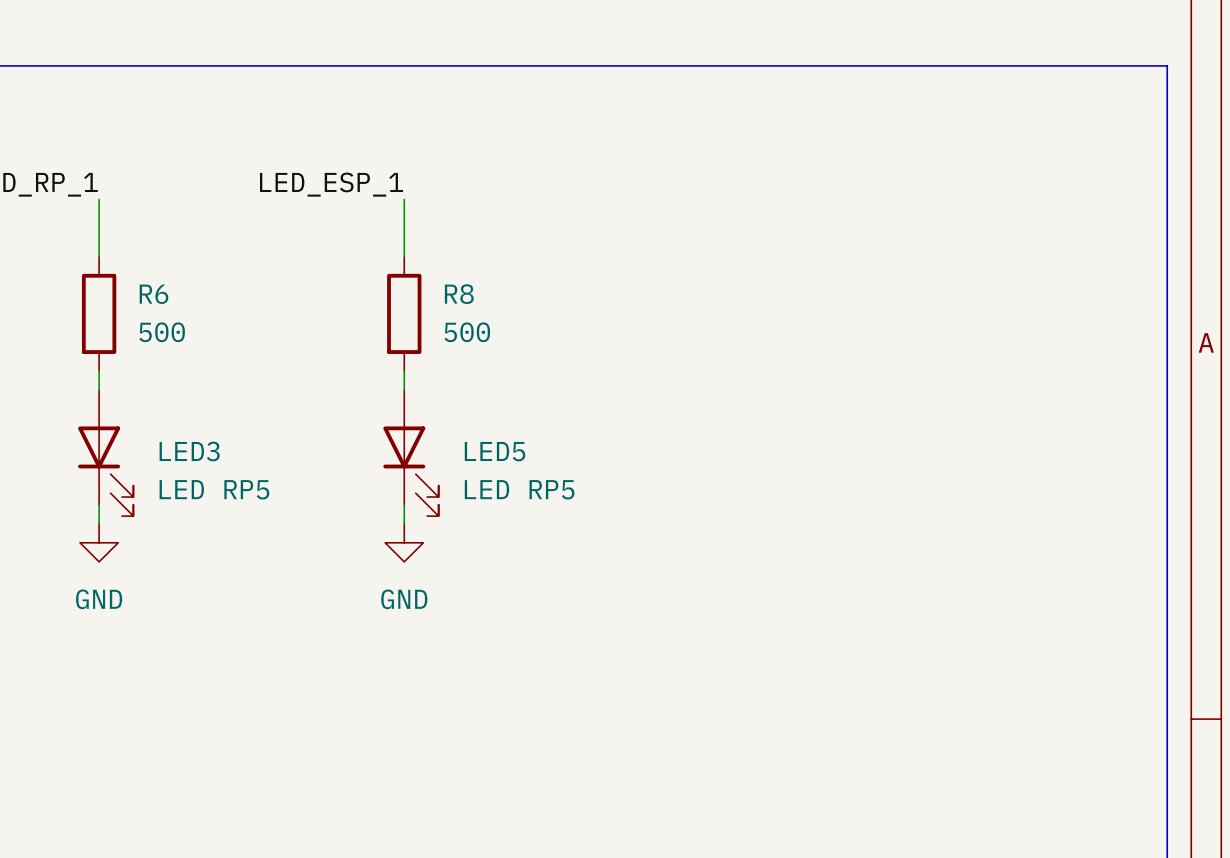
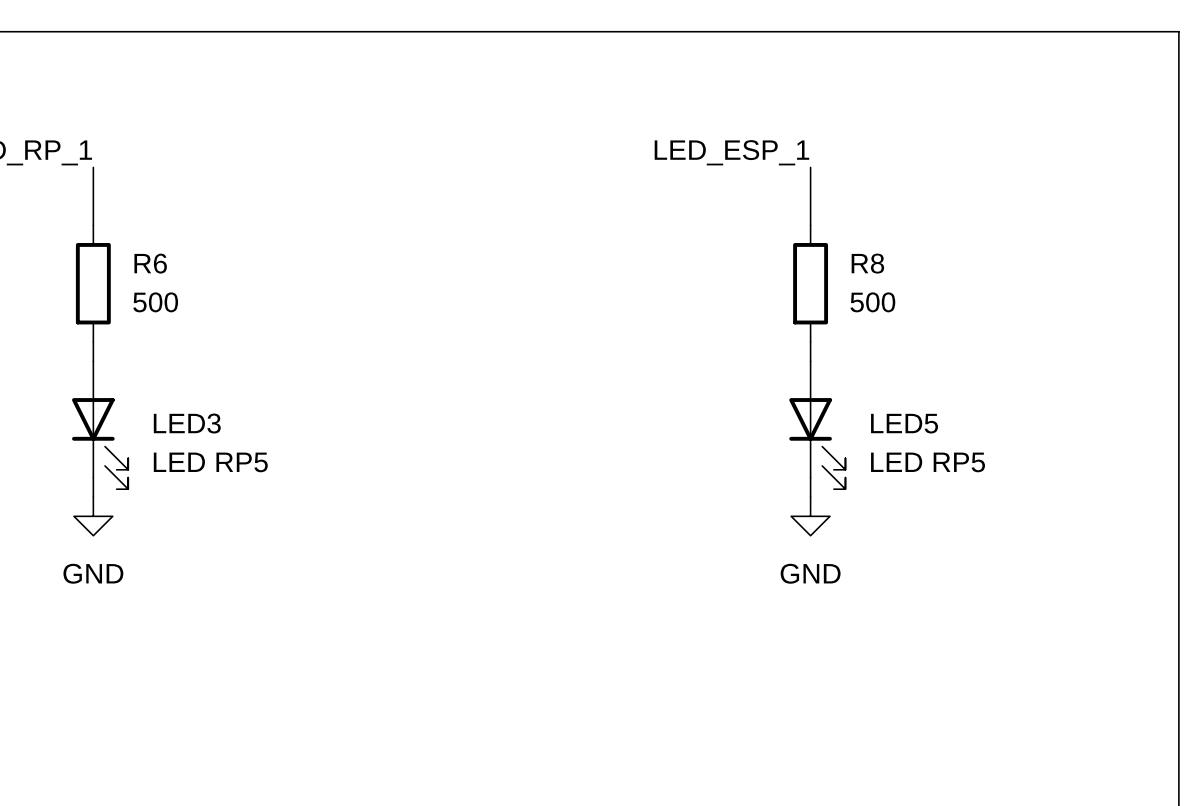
label: LED_ESP_1 (331, 184) -> none
label: none -> LED_ESP_1 (731, 152)
wire: (404, 199) (404, 256) -> none
wire: none -> (810, 167) (810, 225)
R8 position: (404, 313) -> (810, 283)
wire: (404, 371) (404, 390) -> none
wire: none -> (810, 341) (810, 361)
LED5 position: (410, 453) -> (817, 425)
wire: (404, 504) (404, 523) -> none
wire: none -> (810, 477) (810, 496)
power symbol: GND (404, 542) -> none
power symbol: none -> GND (810, 516)

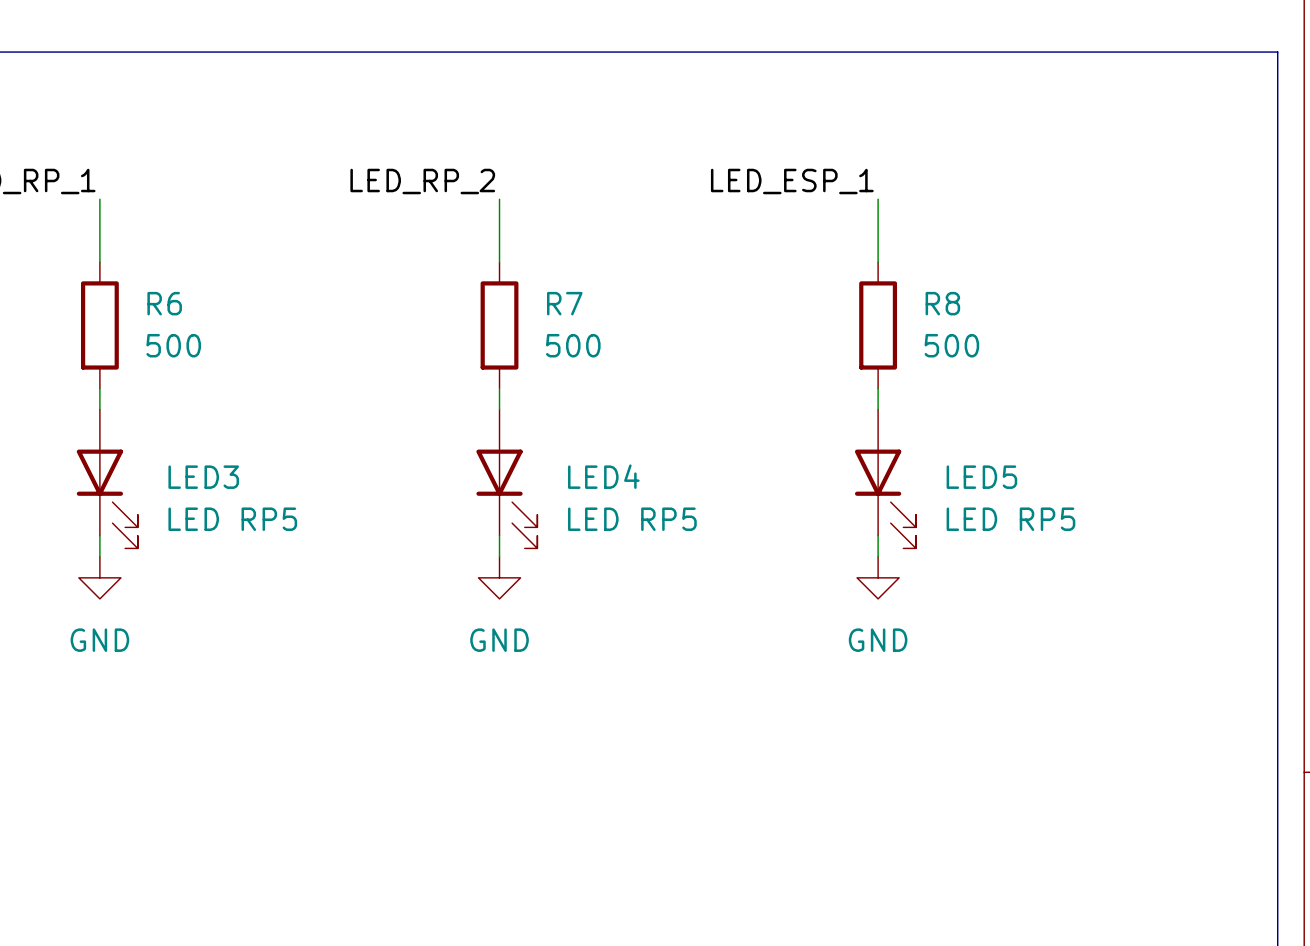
label: none -> LED_RP_2 (422, 181)
wire: none -> (499, 199) (499, 262)
R7: none -> 500 (499, 325)
wire: none -> (499, 388) (499, 409)
LED4: none -> LED RP5 (506, 479)
wire: none -> (499, 535) (499, 556)
power symbol: none -> GND (499, 577)

